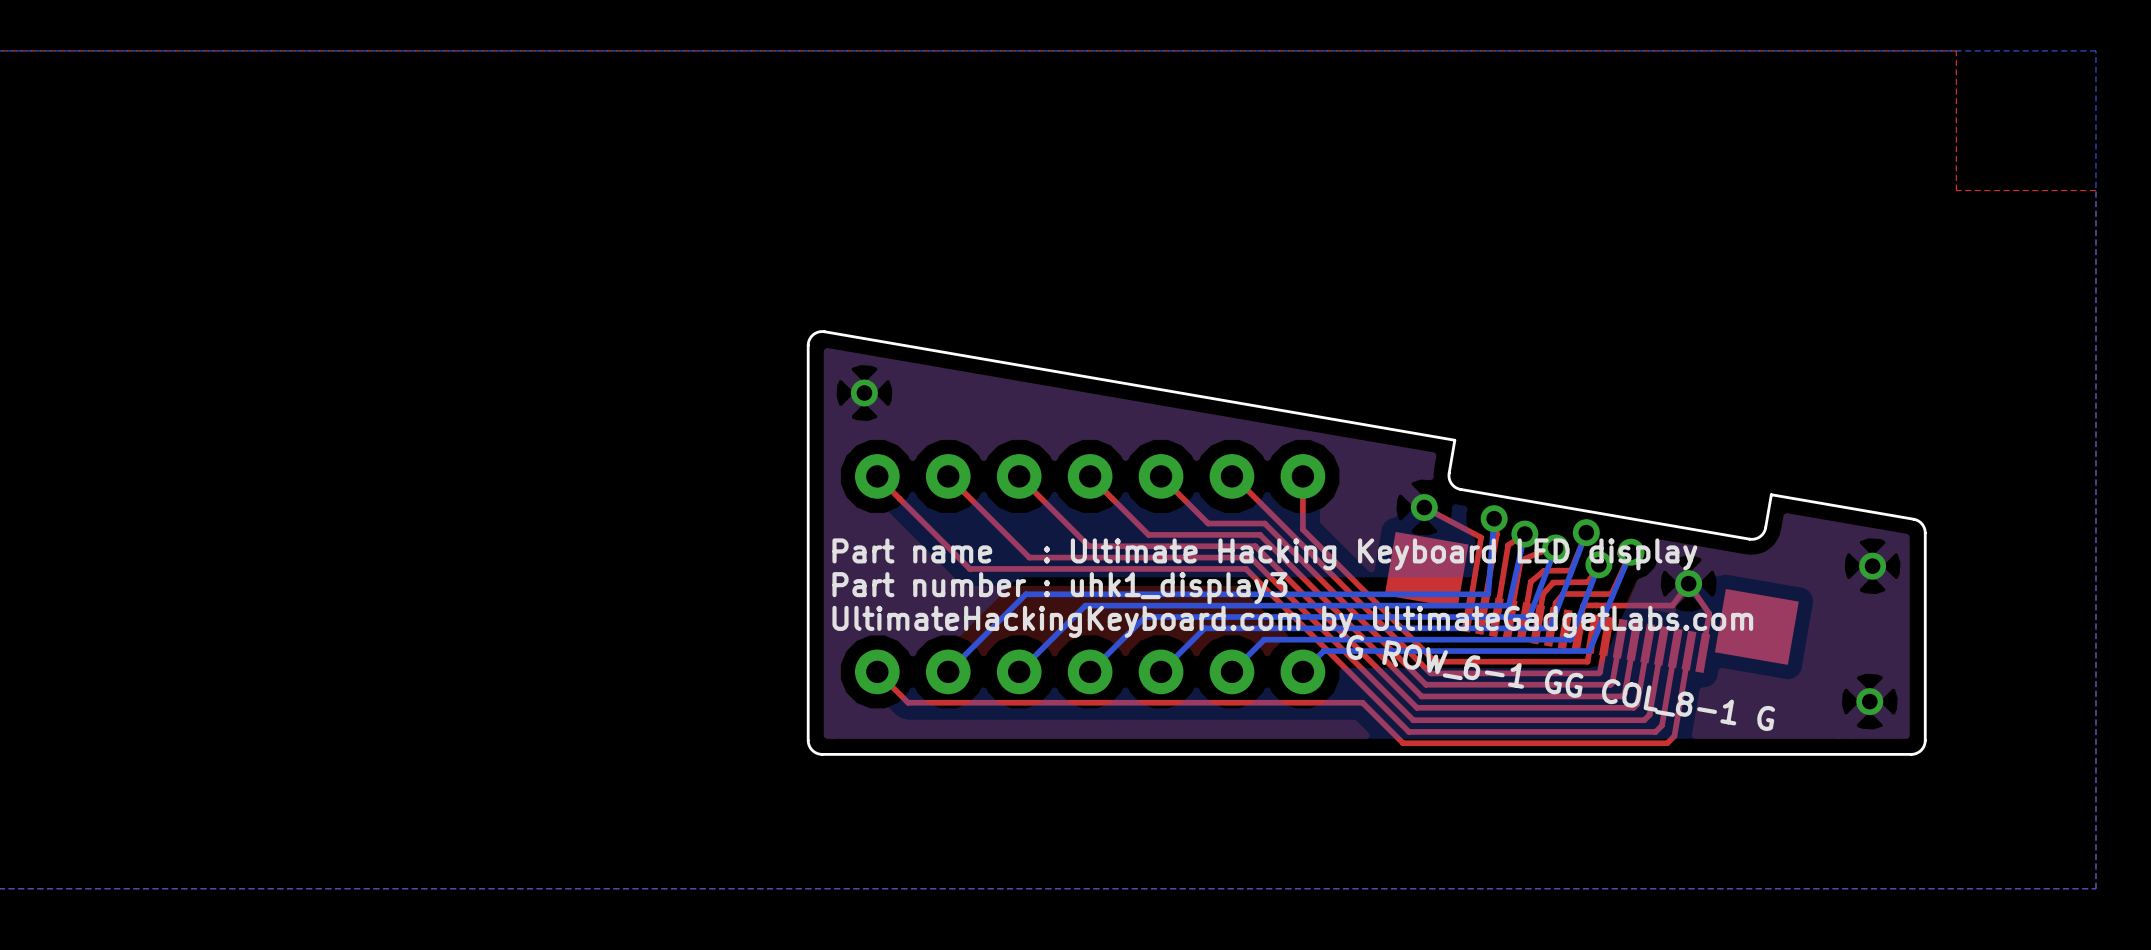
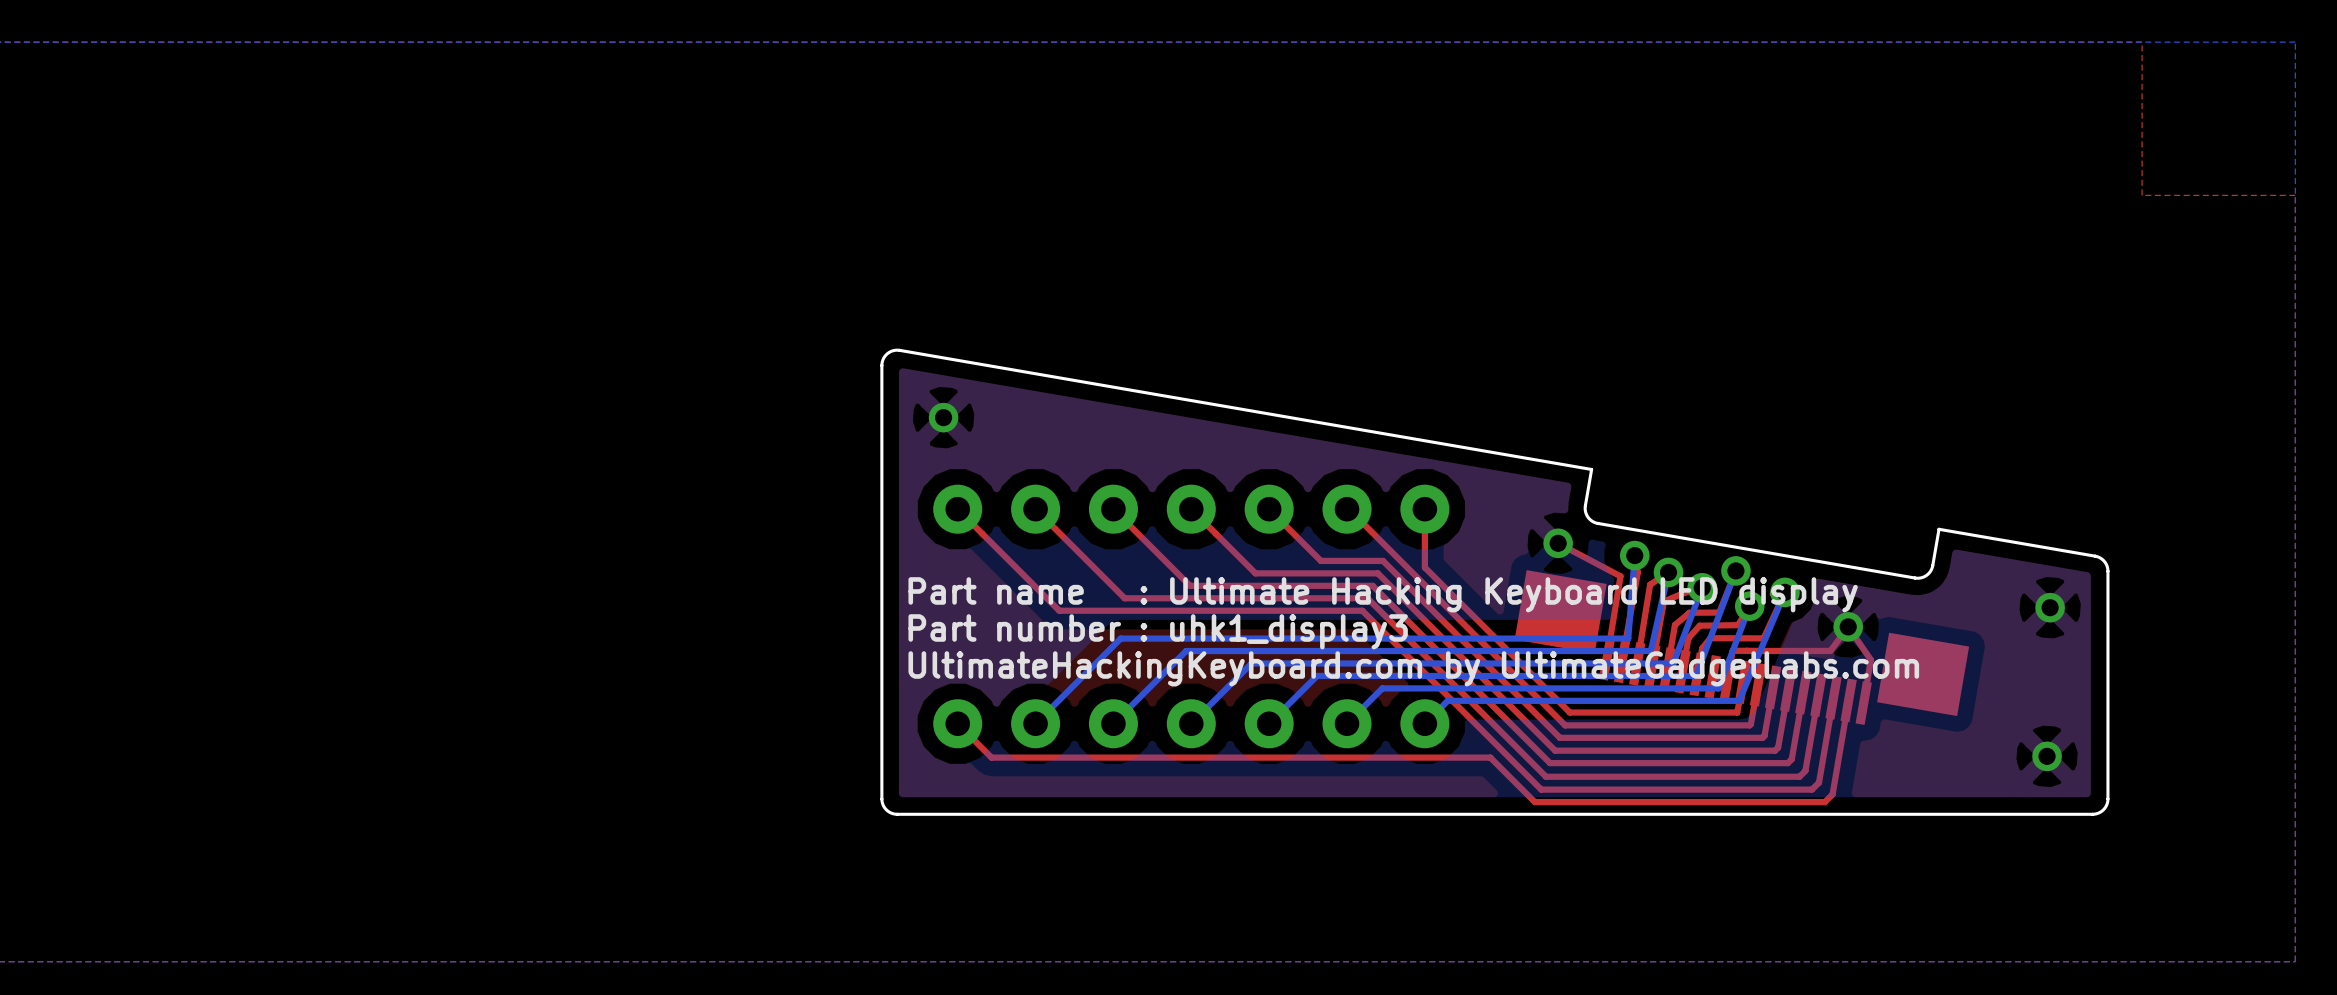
text: G ROW_6-1 GG COL_8-1 G (1560, 682) -> none

